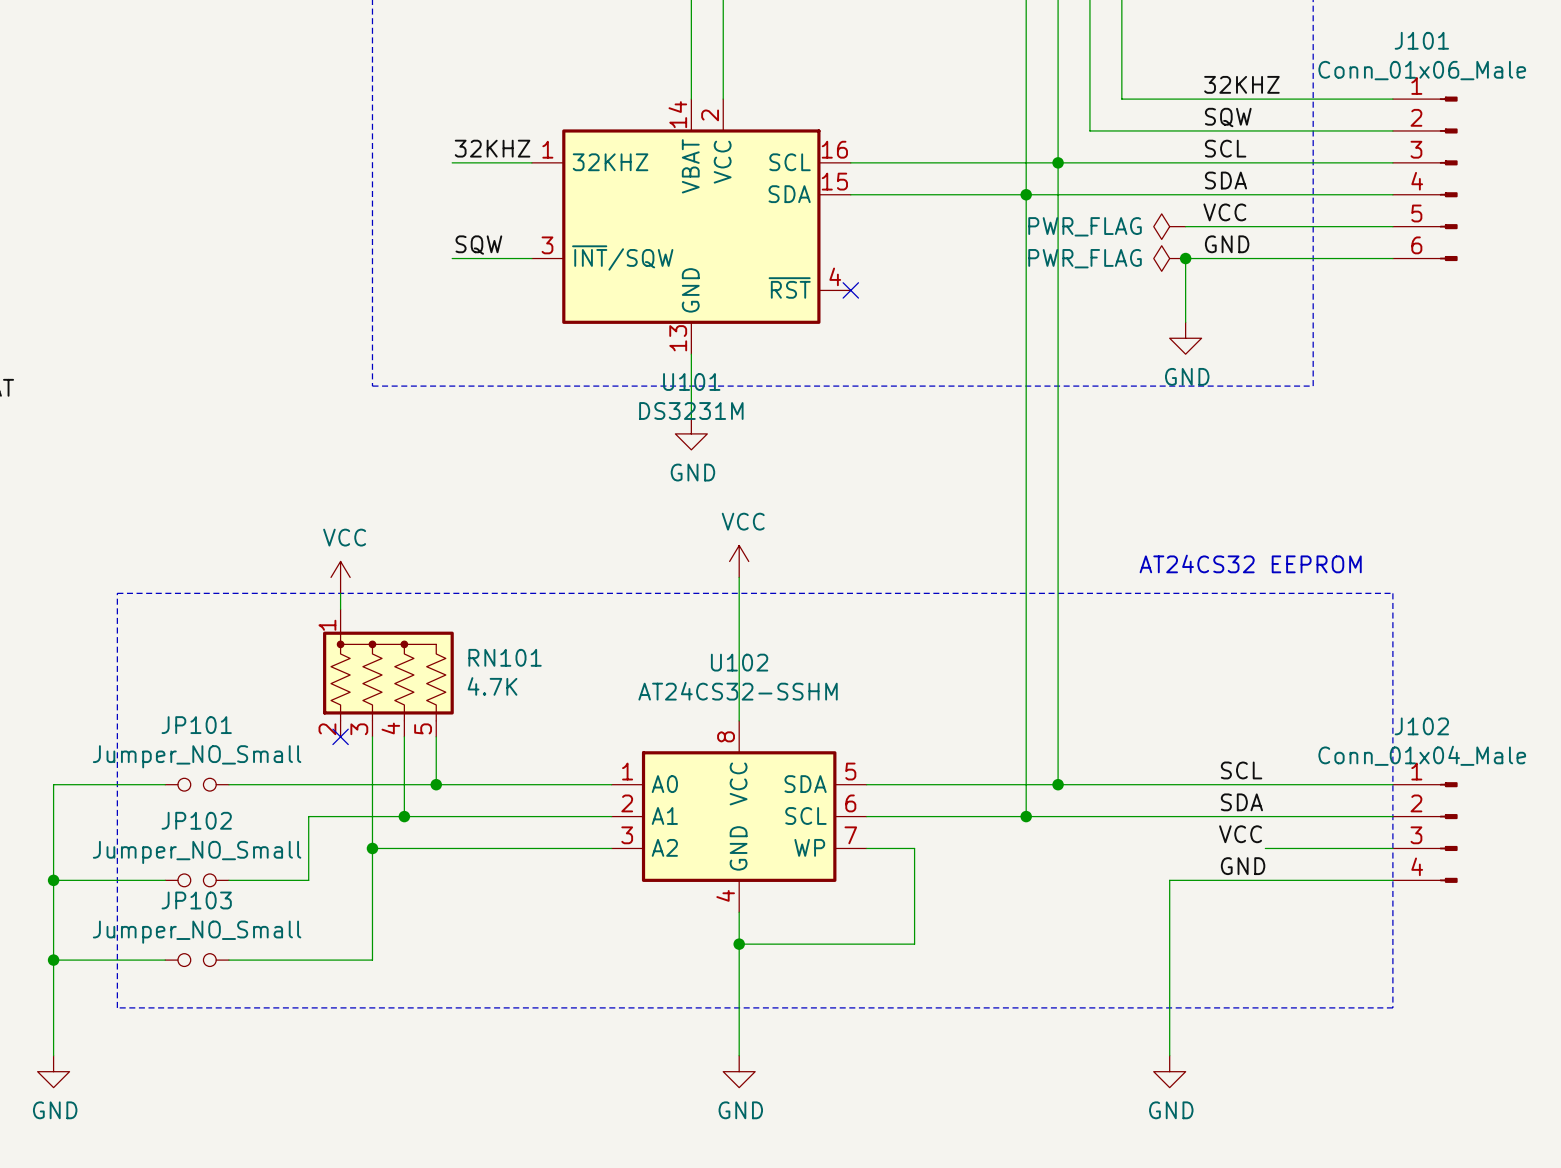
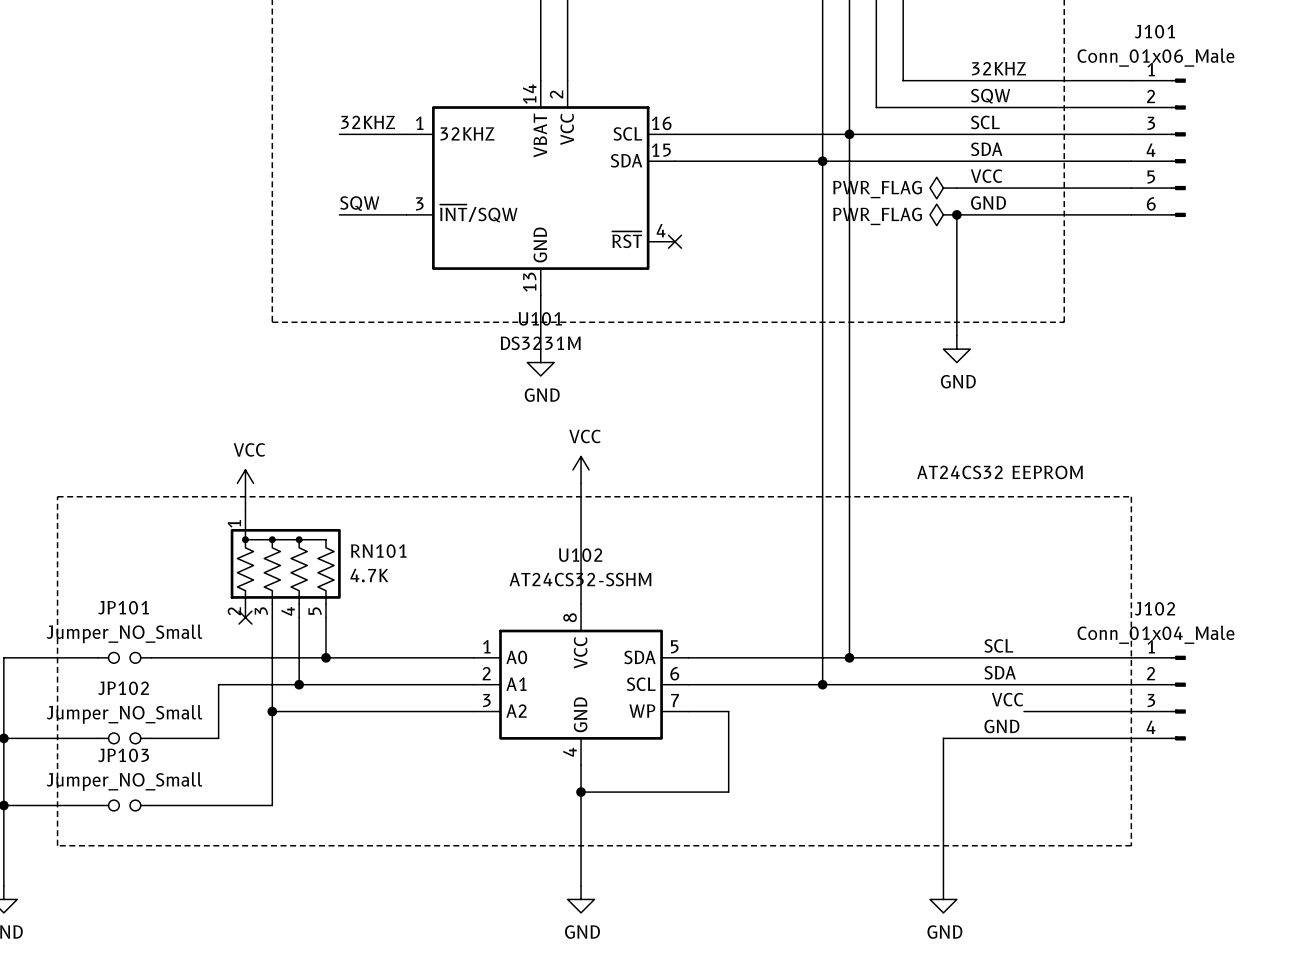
wire: none -> (956, 268) (956, 335)
power symbol position: GND (1185, 338) -> GND (956, 349)

